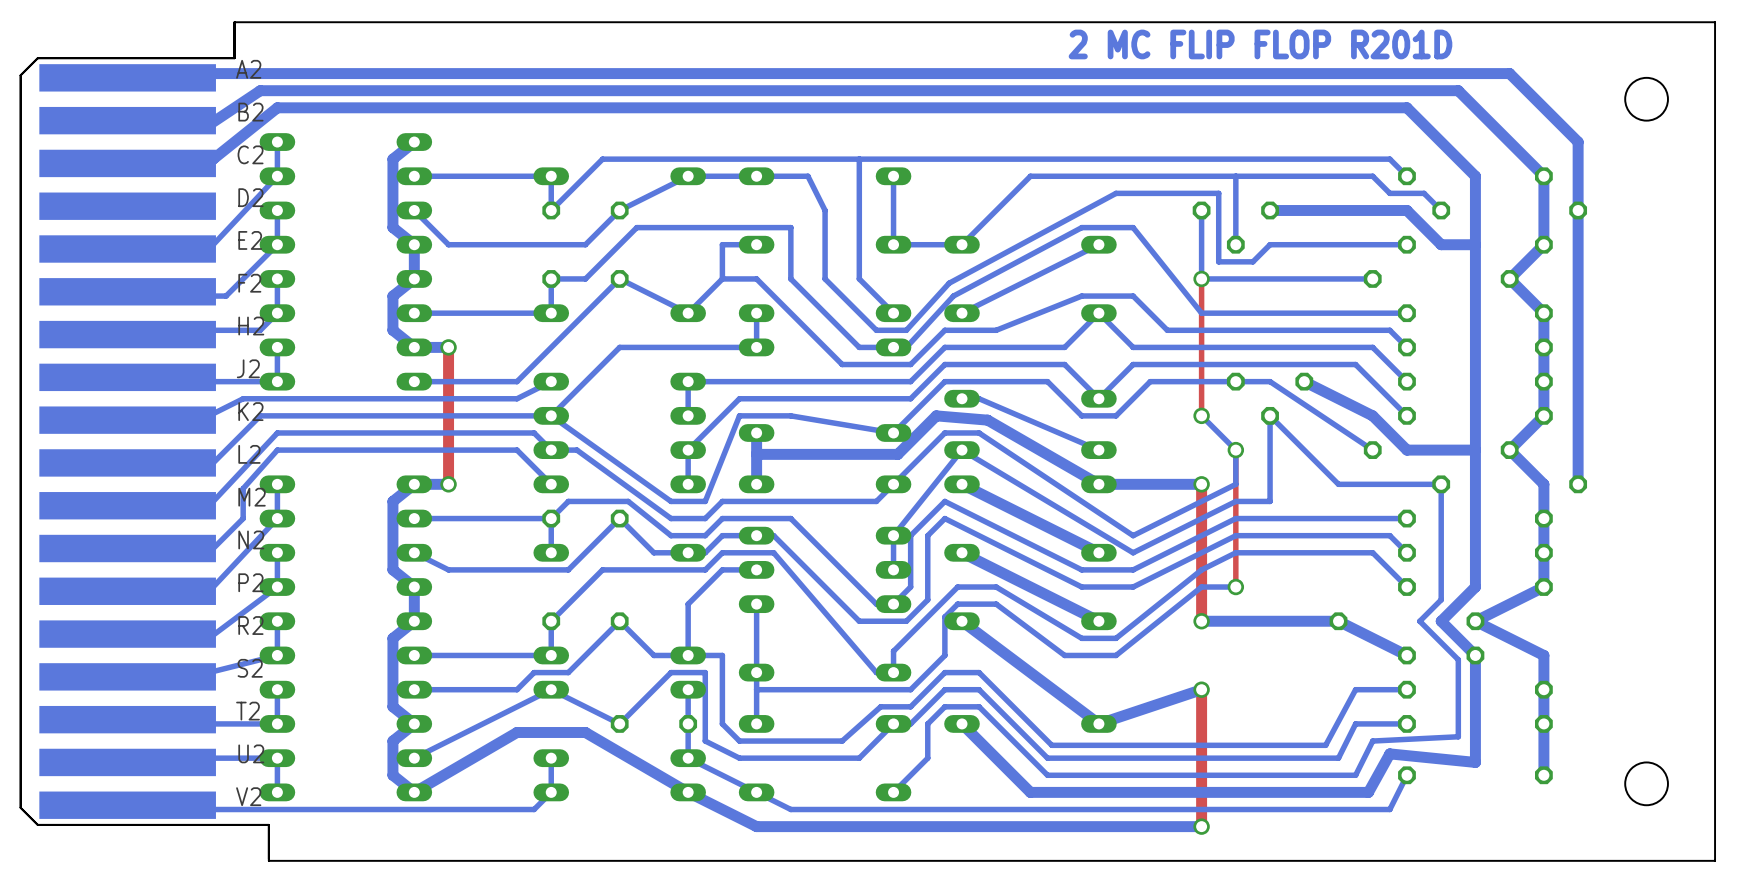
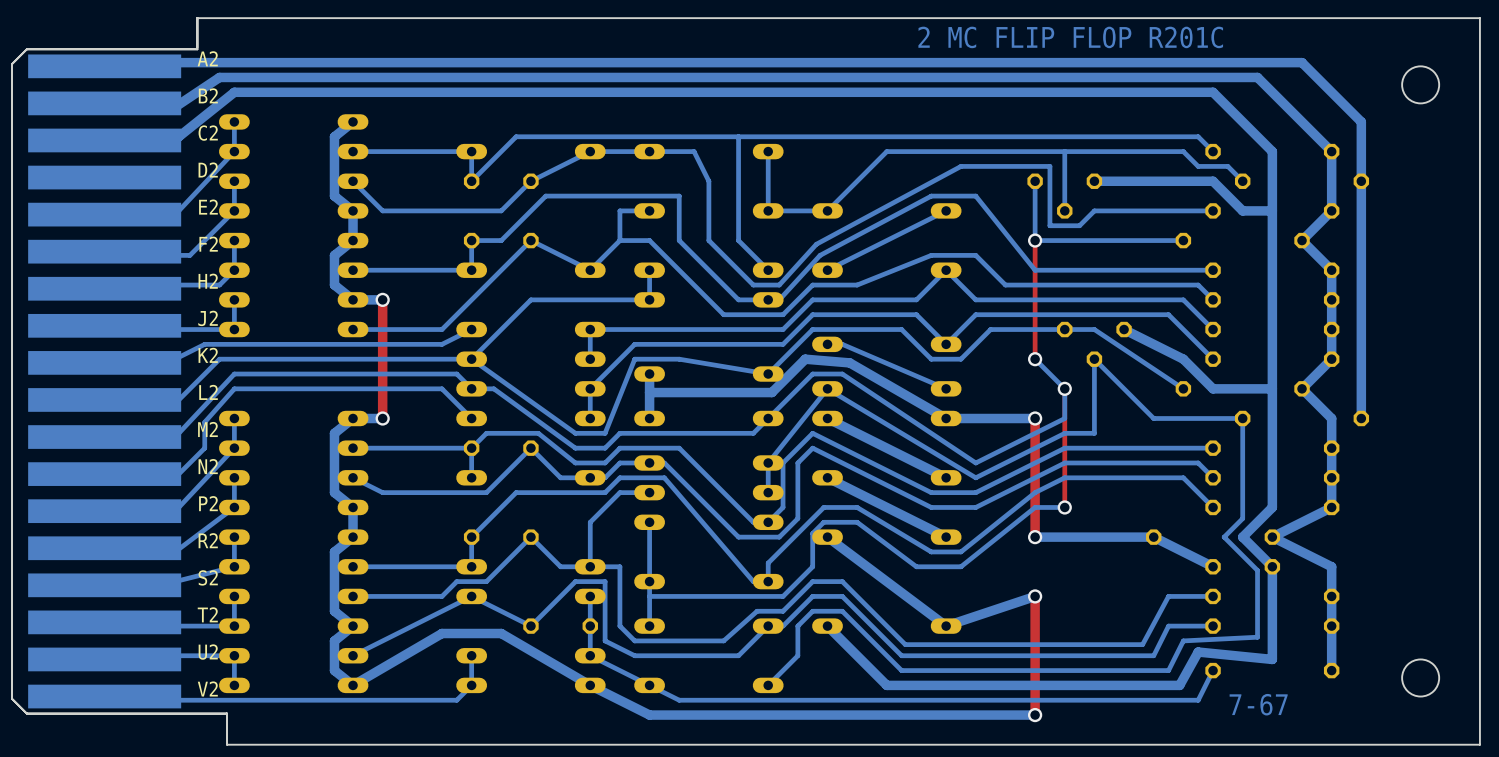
text: 2 MC FLIP FLOP R201D (1260, 44) -> 2 MC FLIP FLOP R201C (1070, 37)
text: none -> 7-67 (1258, 704)

